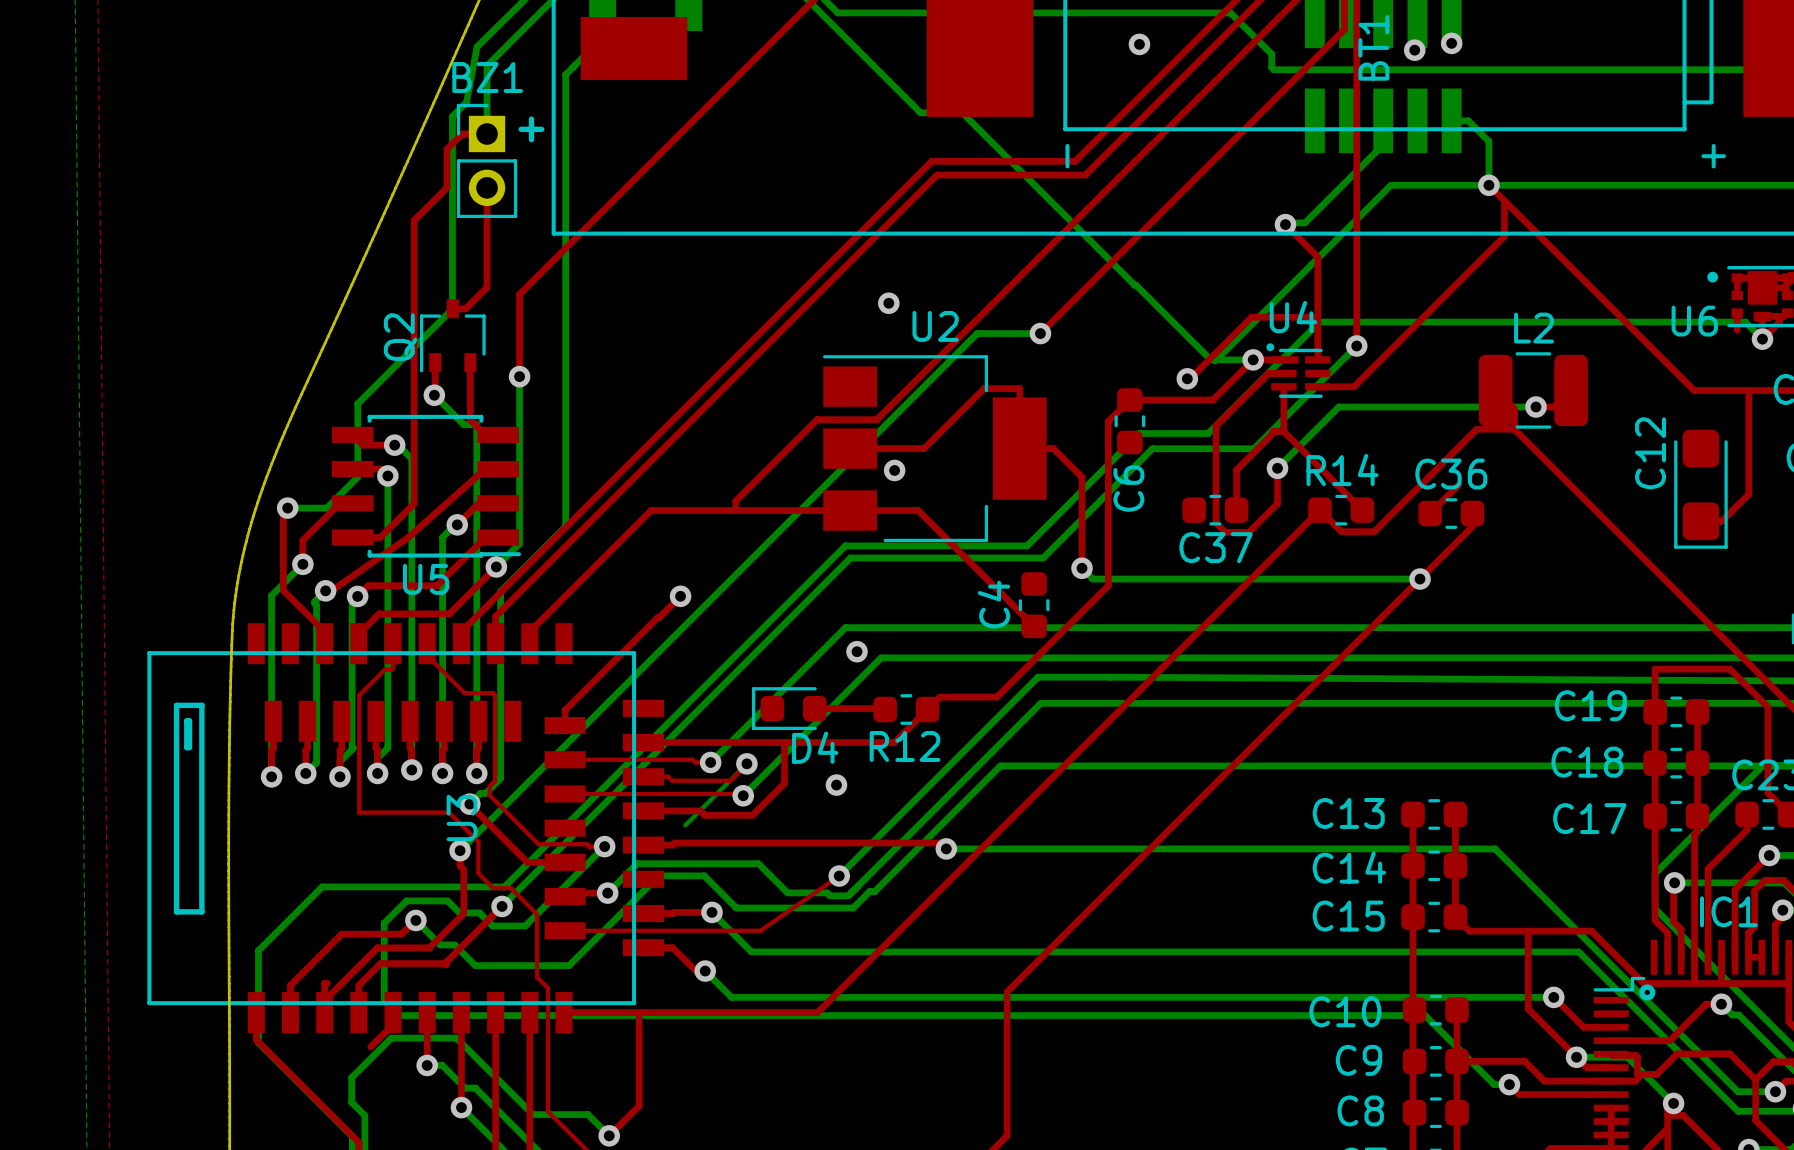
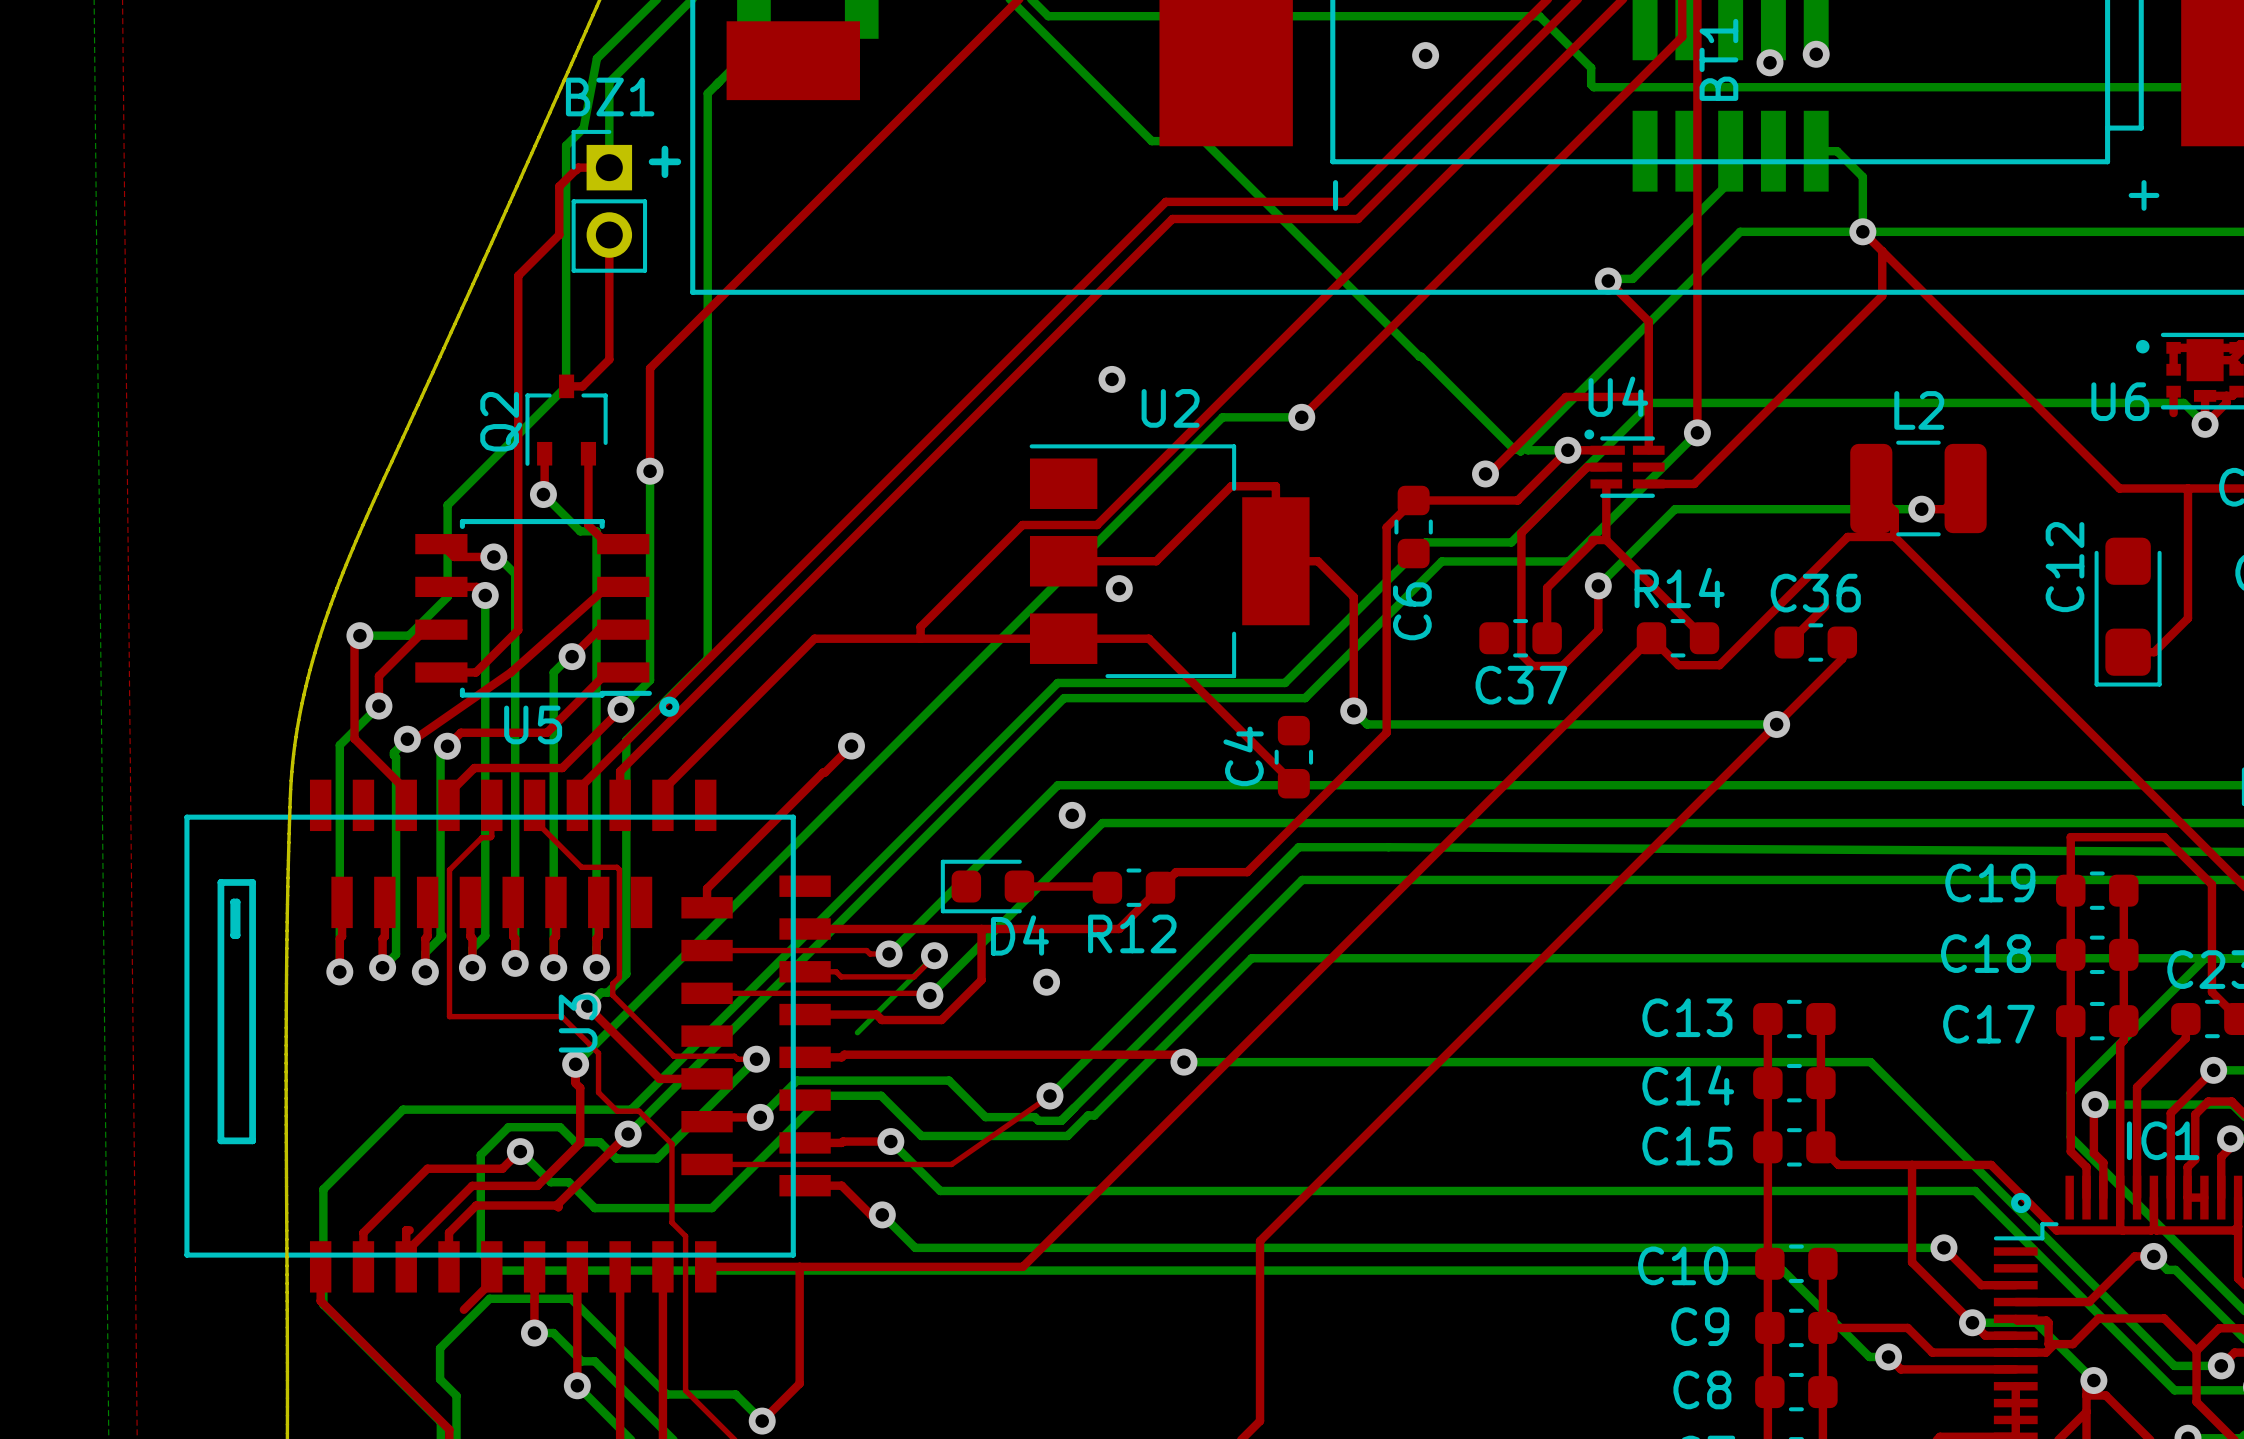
drawing: none -> [659, 696, 680, 717]
drawing position: (1647, 992) -> (2021, 1202)

